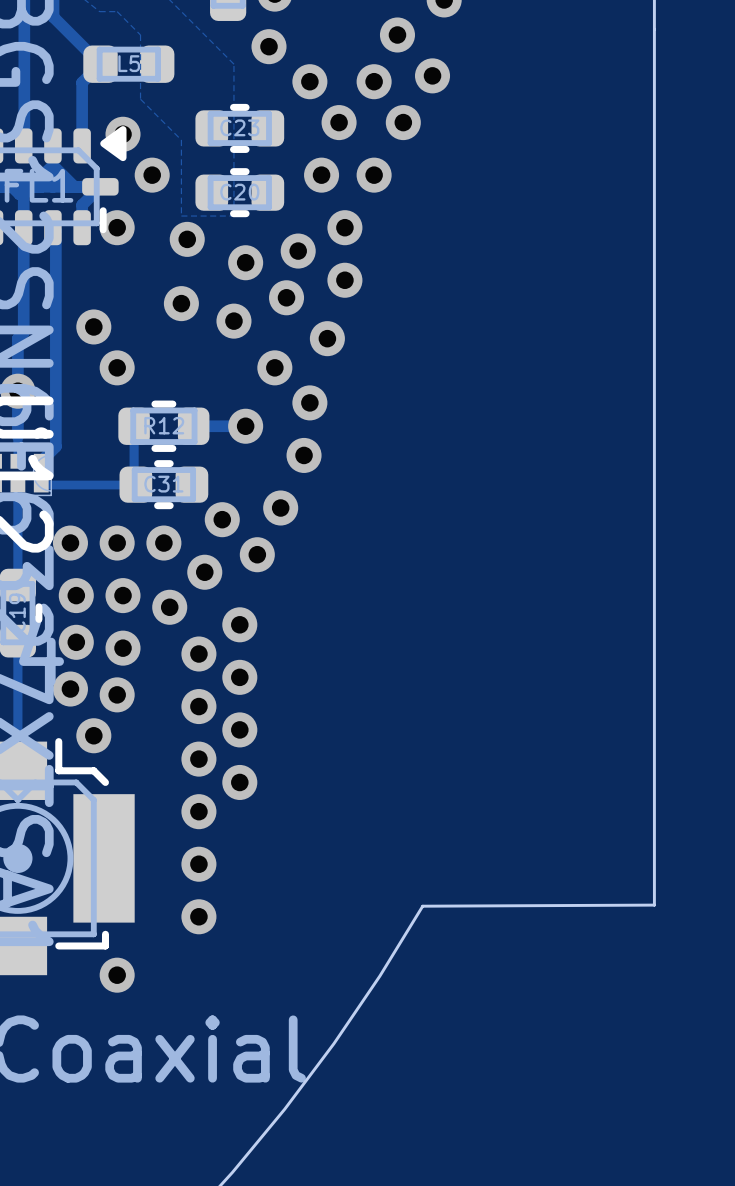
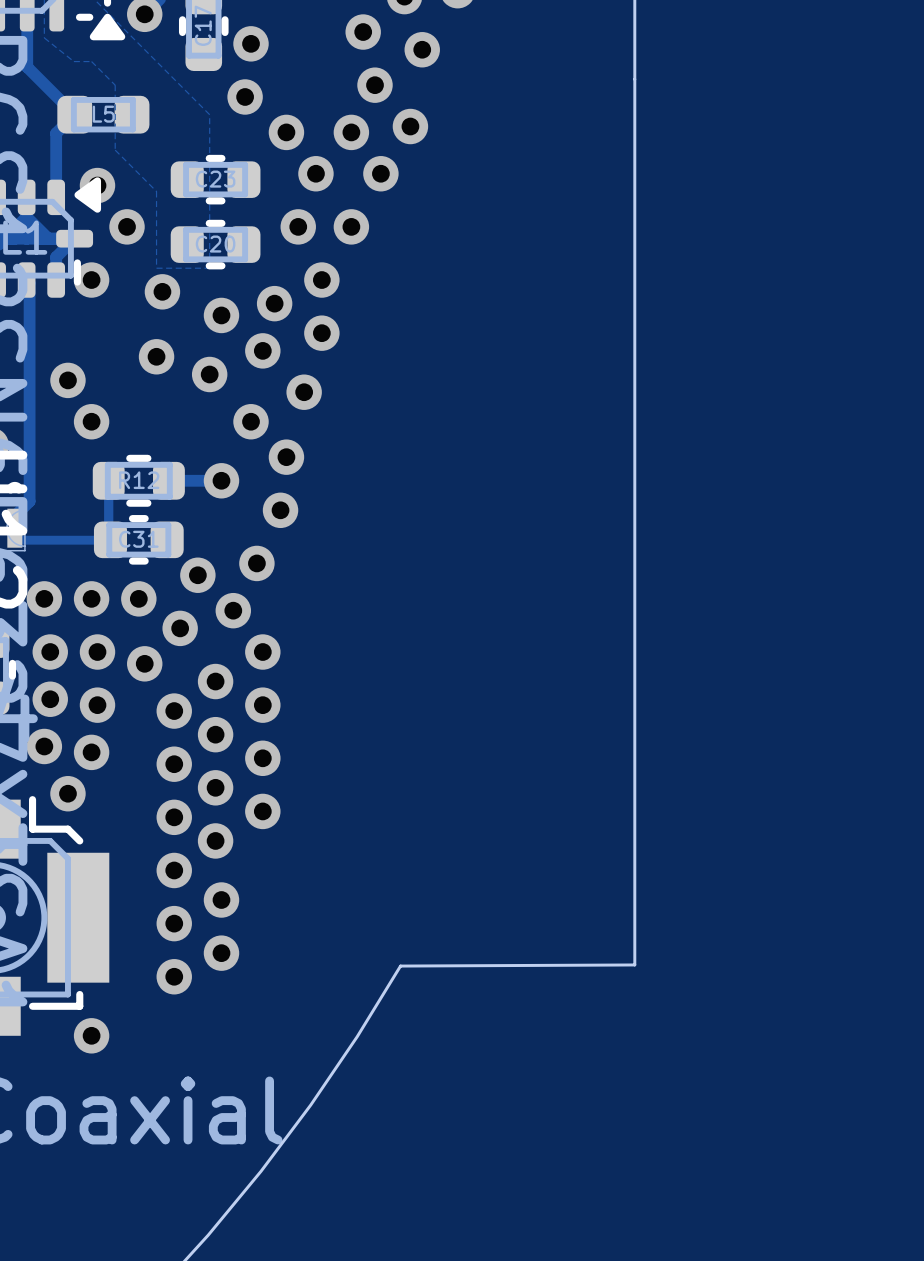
via: none -> (262, 652)
via: none -> (262, 705)
via: none -> (262, 758)
via: none -> (262, 811)
via: none -> (221, 900)
via: none -> (221, 953)

